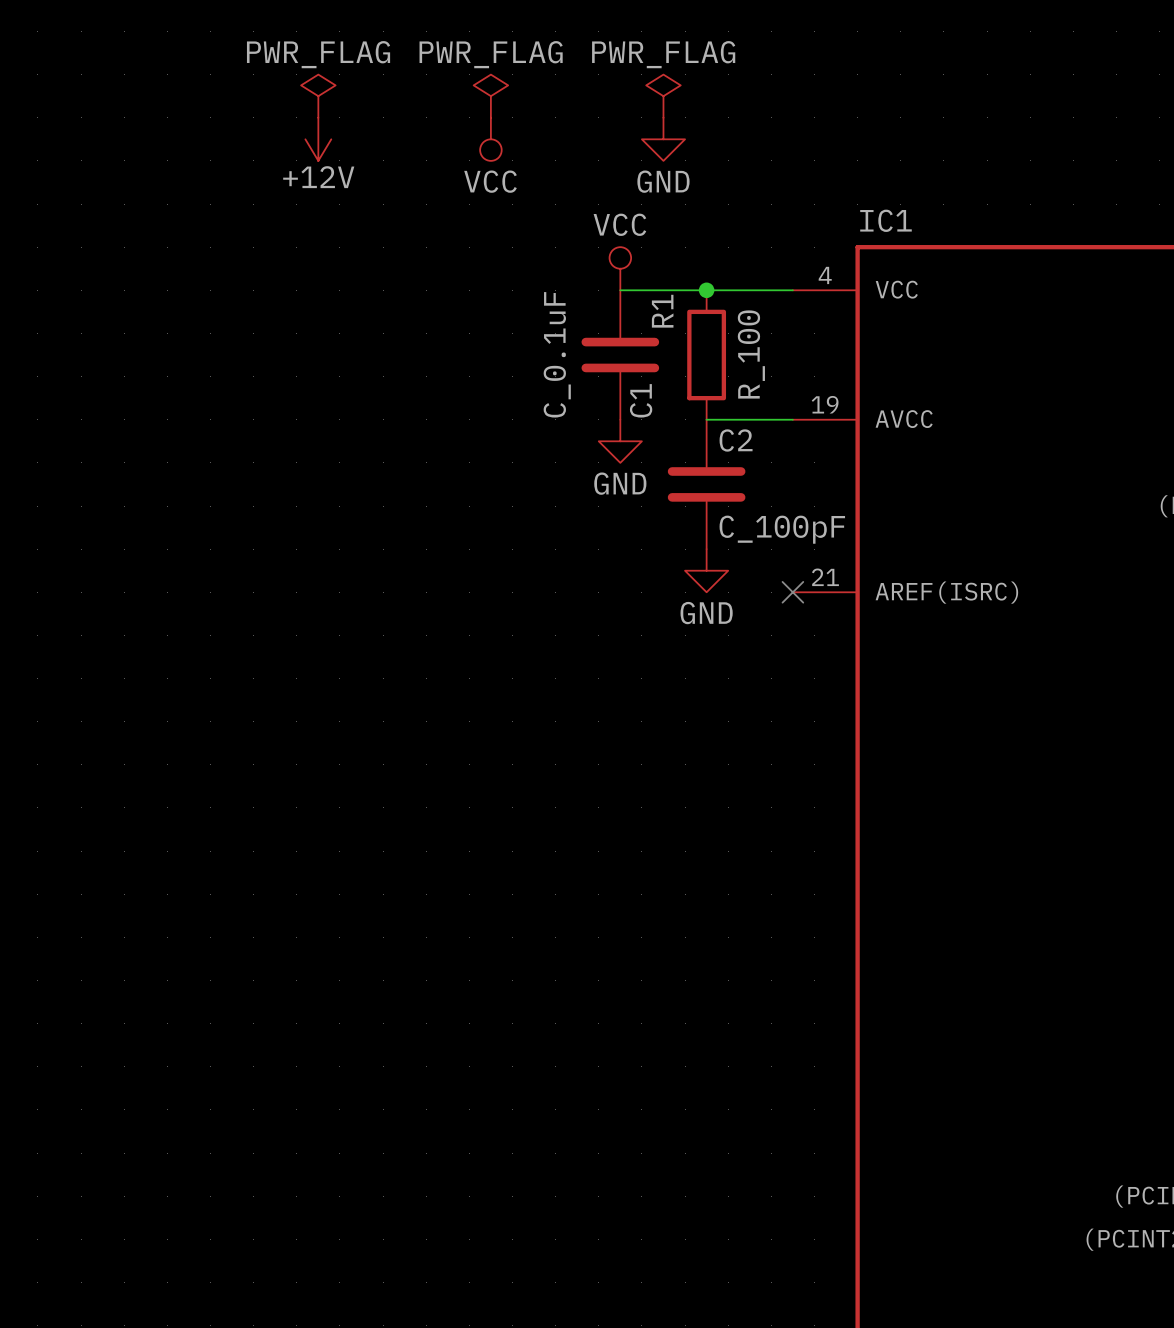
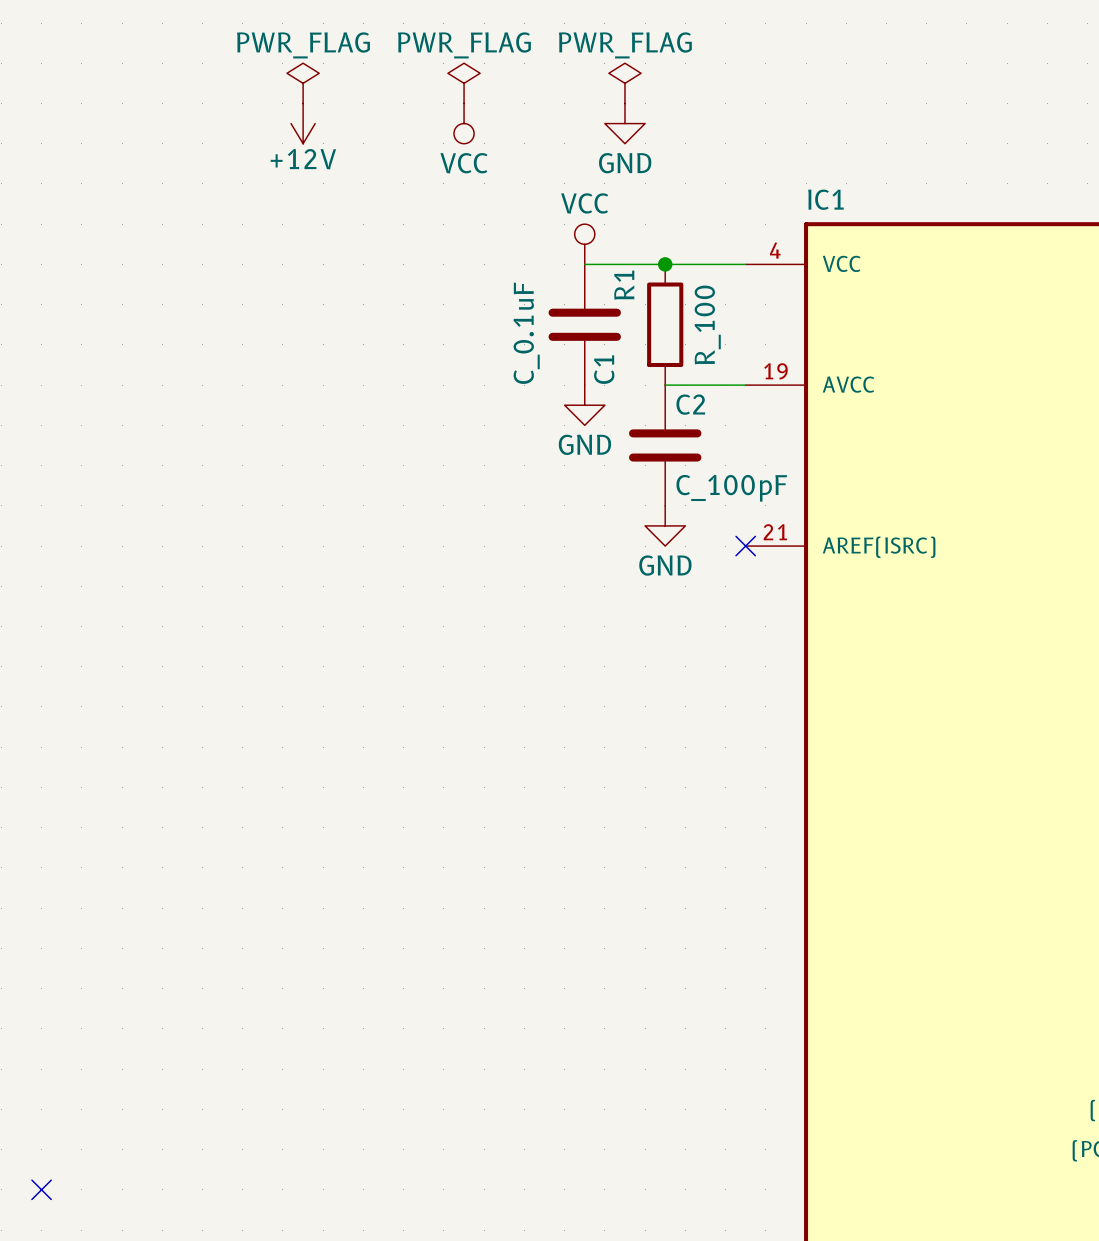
no-connect mark: none -> (41, 1189)

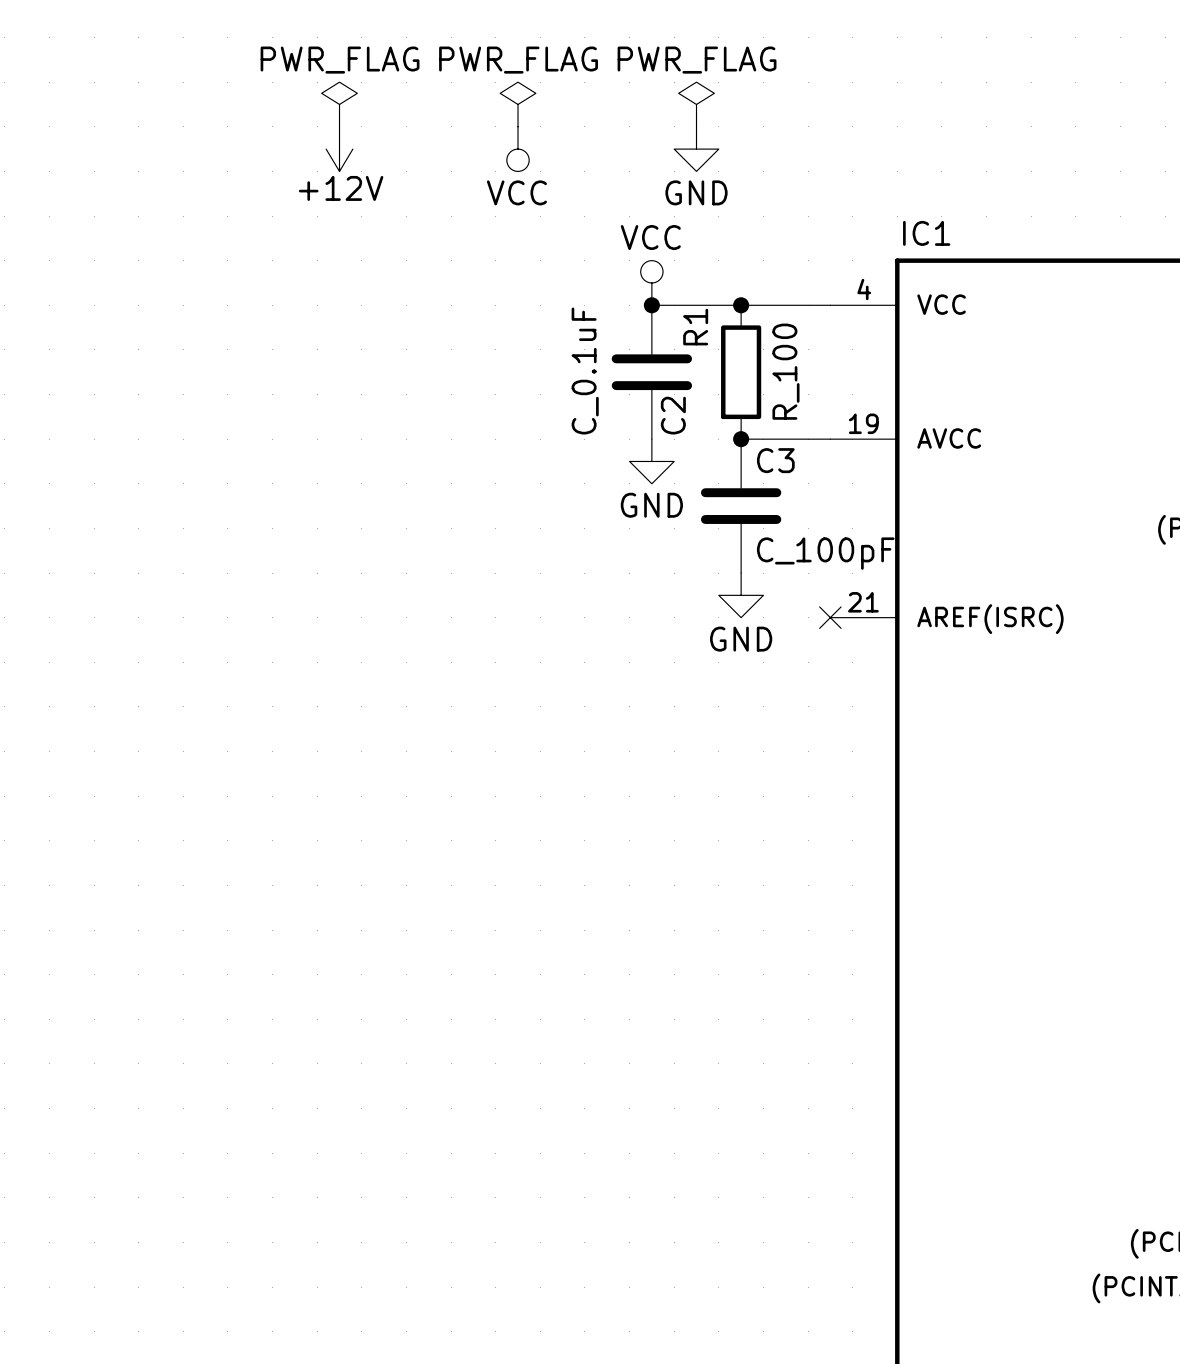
junction: none -> (651, 305)
C1 name: C1 (604, 369) -> C2 (673, 415)
junction: none -> (741, 439)
C2 name: C2 (690, 404) -> C3 (775, 460)
no-connect mark: (41, 1189) -> none

